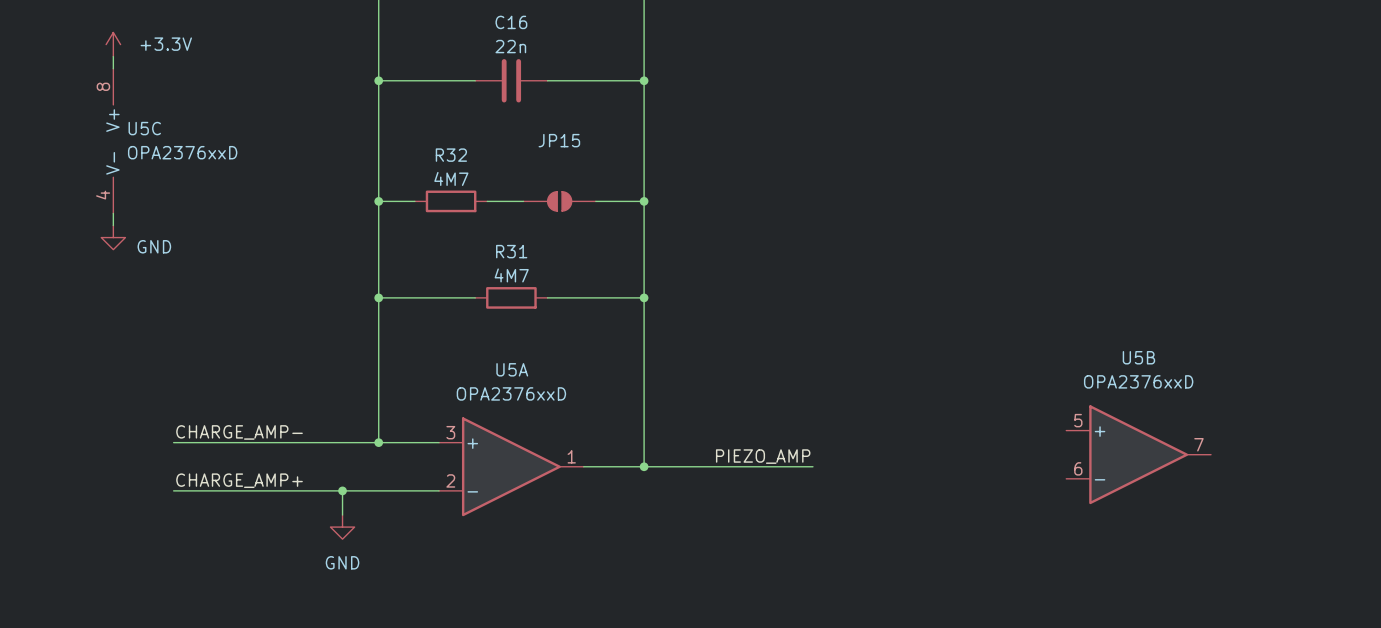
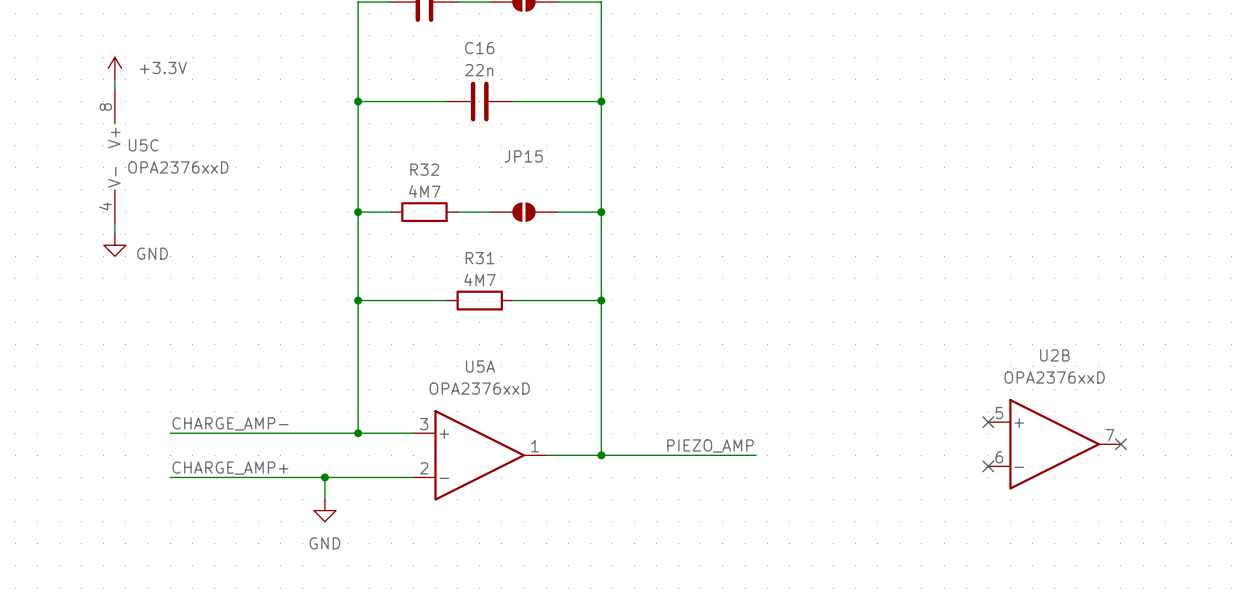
U5B name: U5B (1138, 357) -> U2B (1054, 355)
no-connect mark: none -> (988, 422)
no-connect mark: none -> (1120, 444)
no-connect mark: none -> (988, 466)

